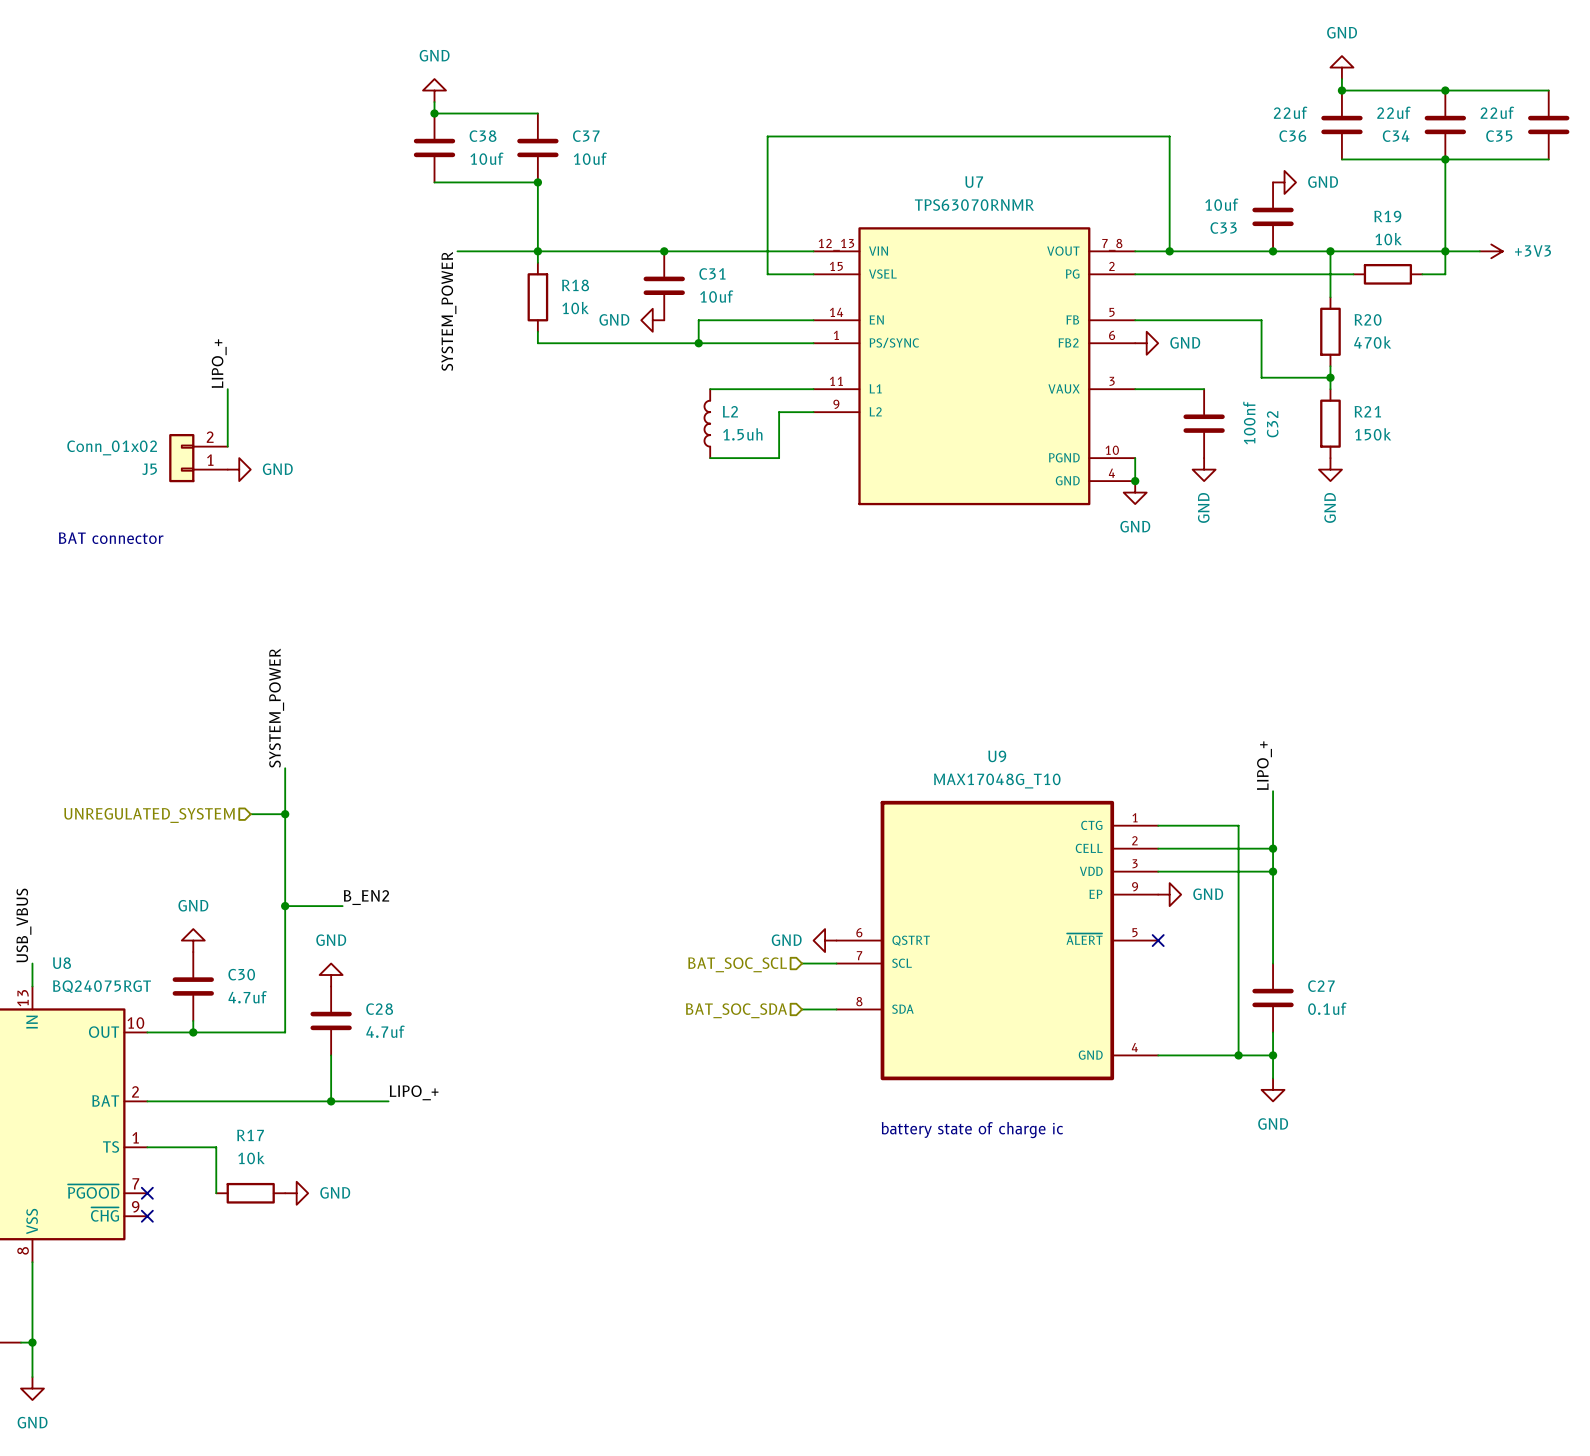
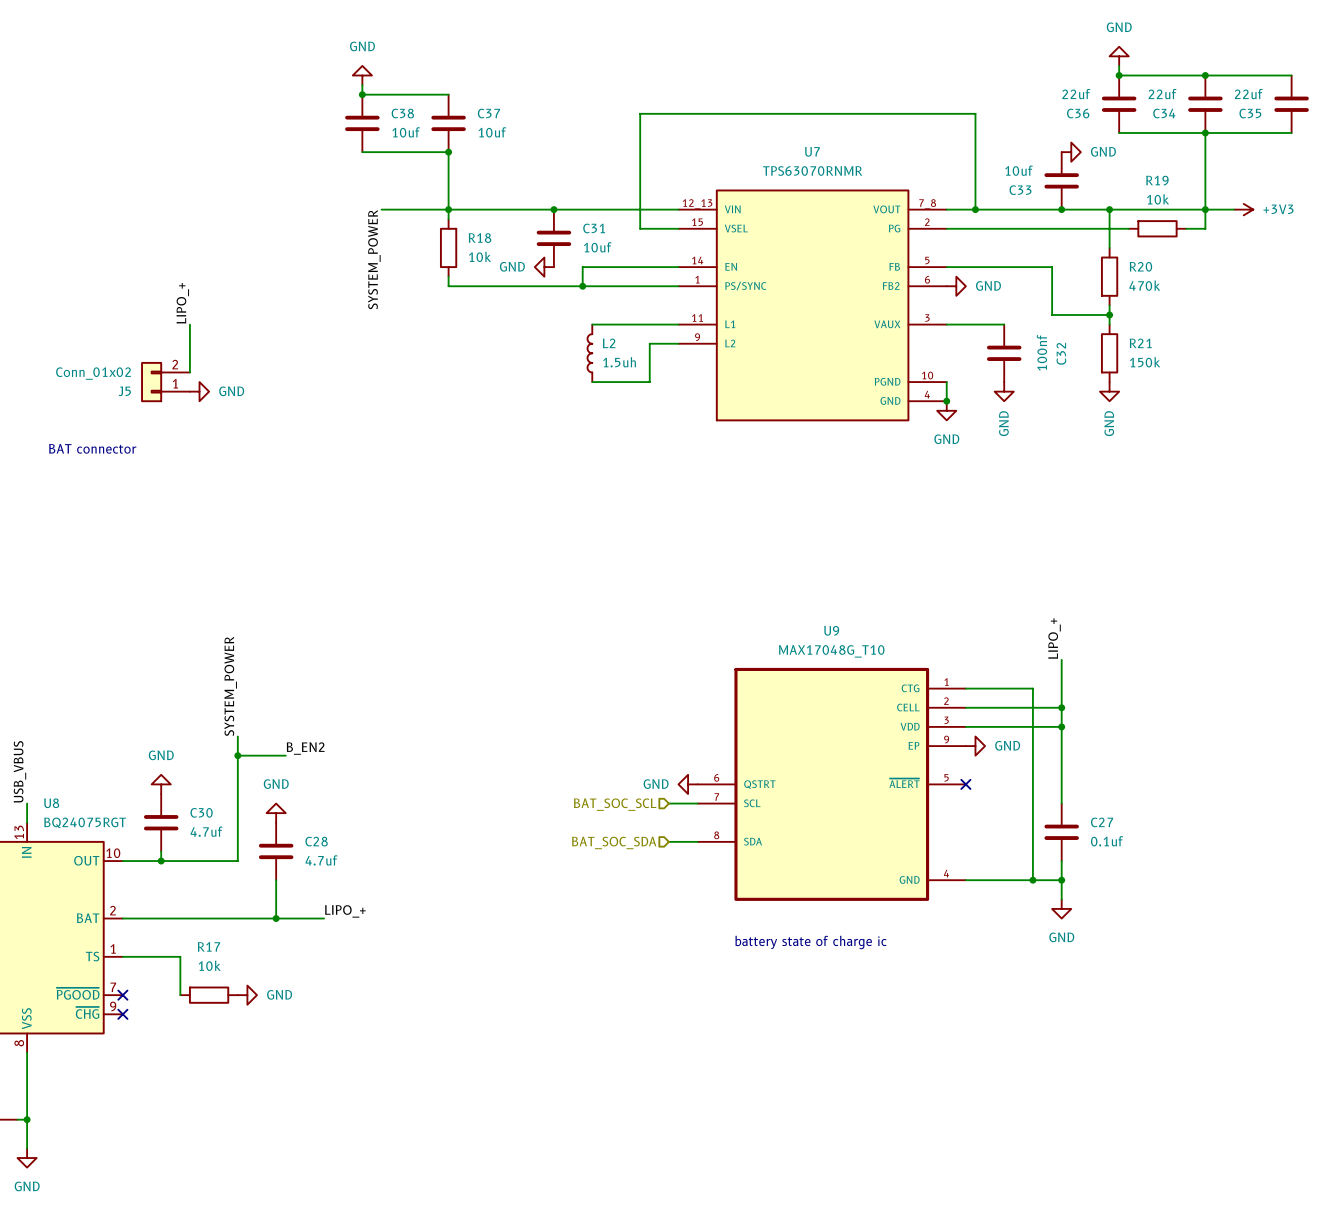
label position: SYSTEM_POWER (276, 708) -> SYSTEM_POWER (230, 686)
wire: (285, 768) (285, 883) -> none
wire: (250, 814) (285, 814) -> none
junction: (285, 814) -> none
hierarchical label: UNREGULATED_SYSTEM (149, 815) -> none

